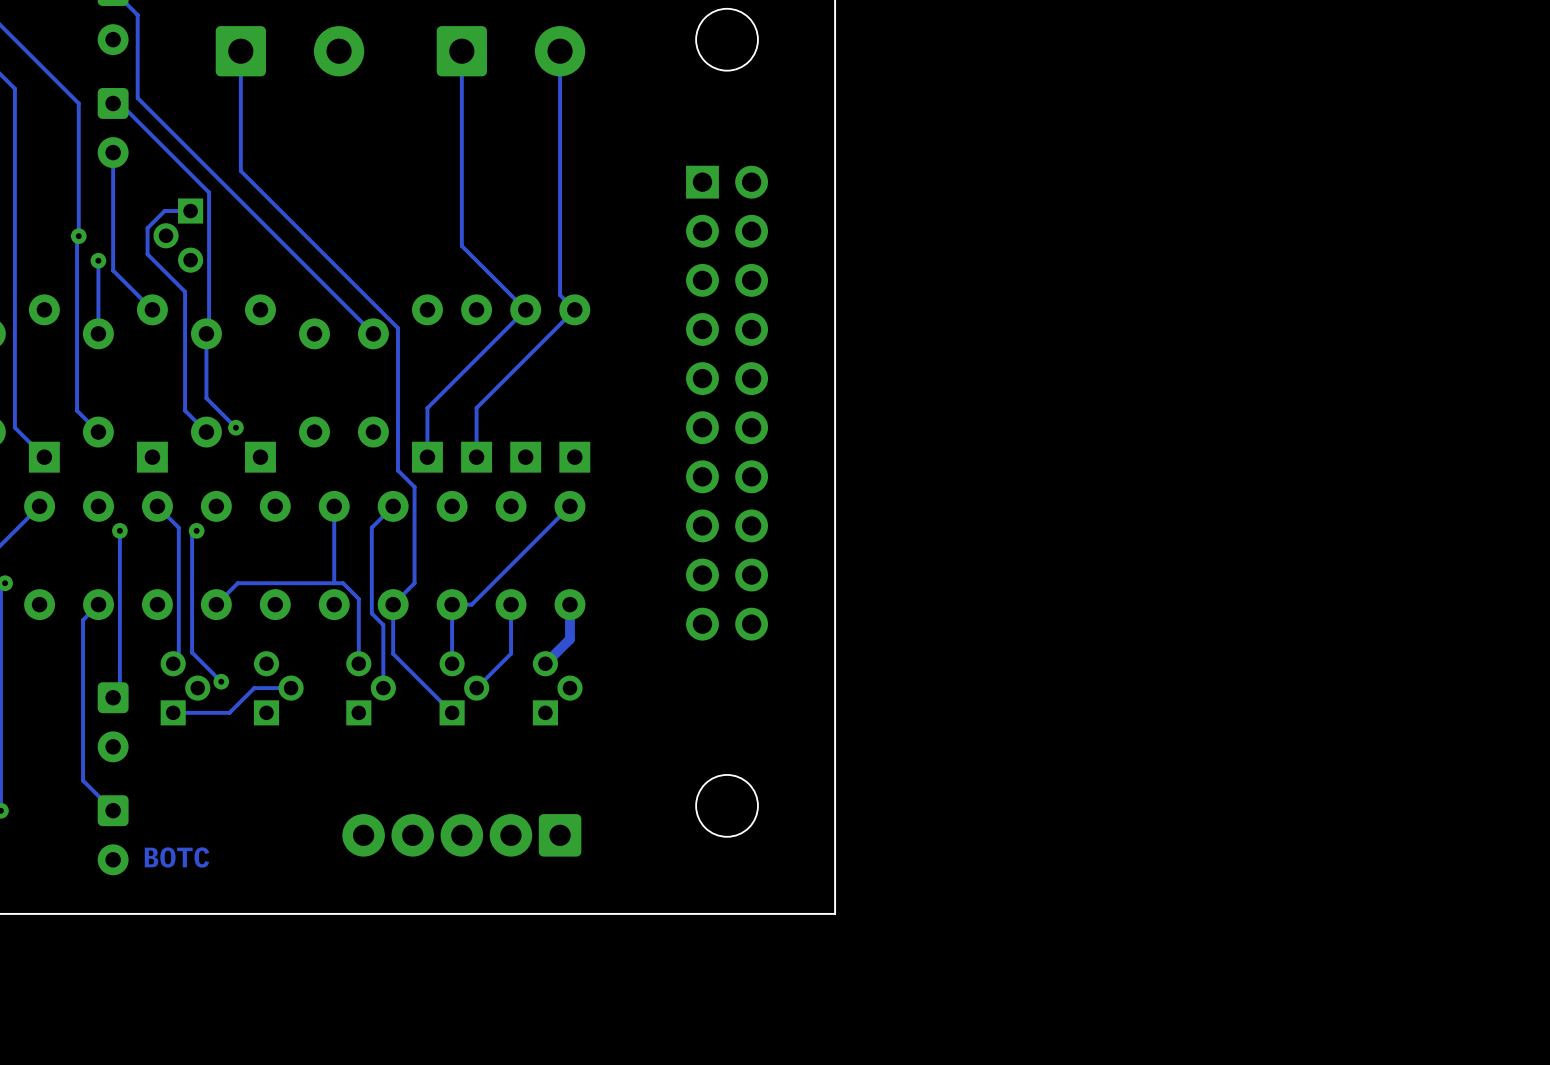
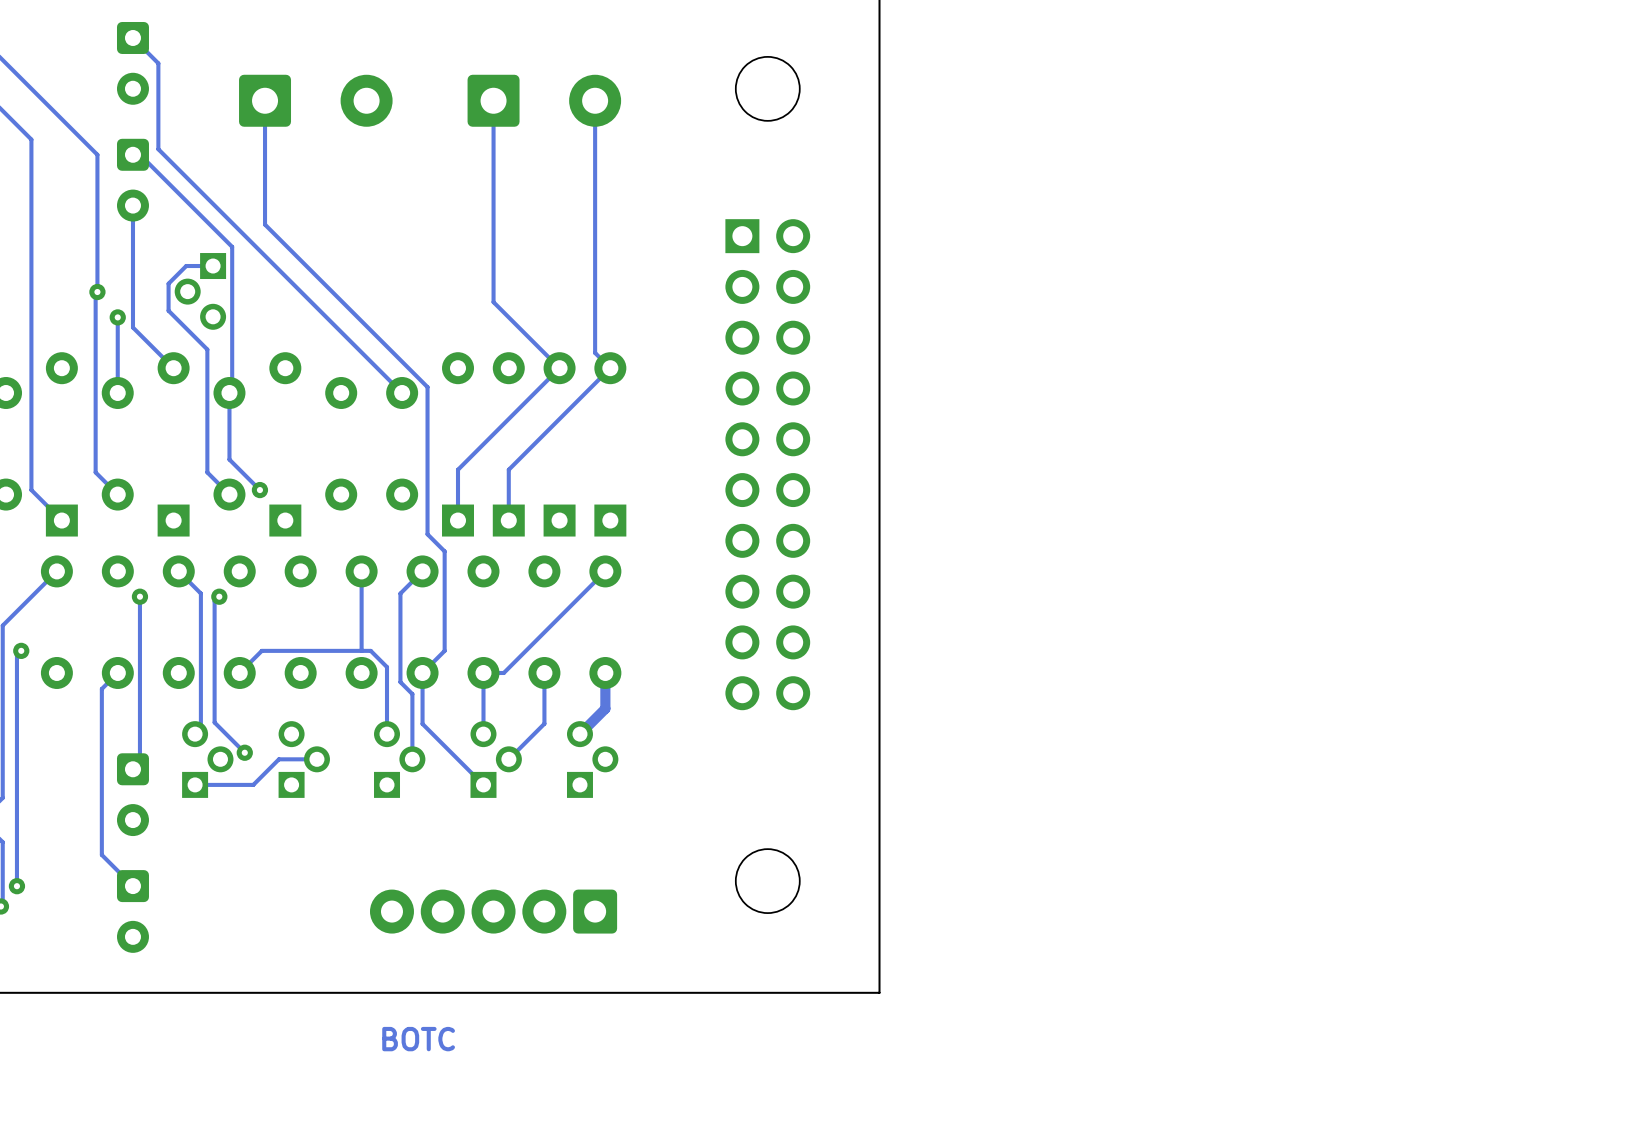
text position: BOTC (176, 857) -> BOTC (418, 1039)

